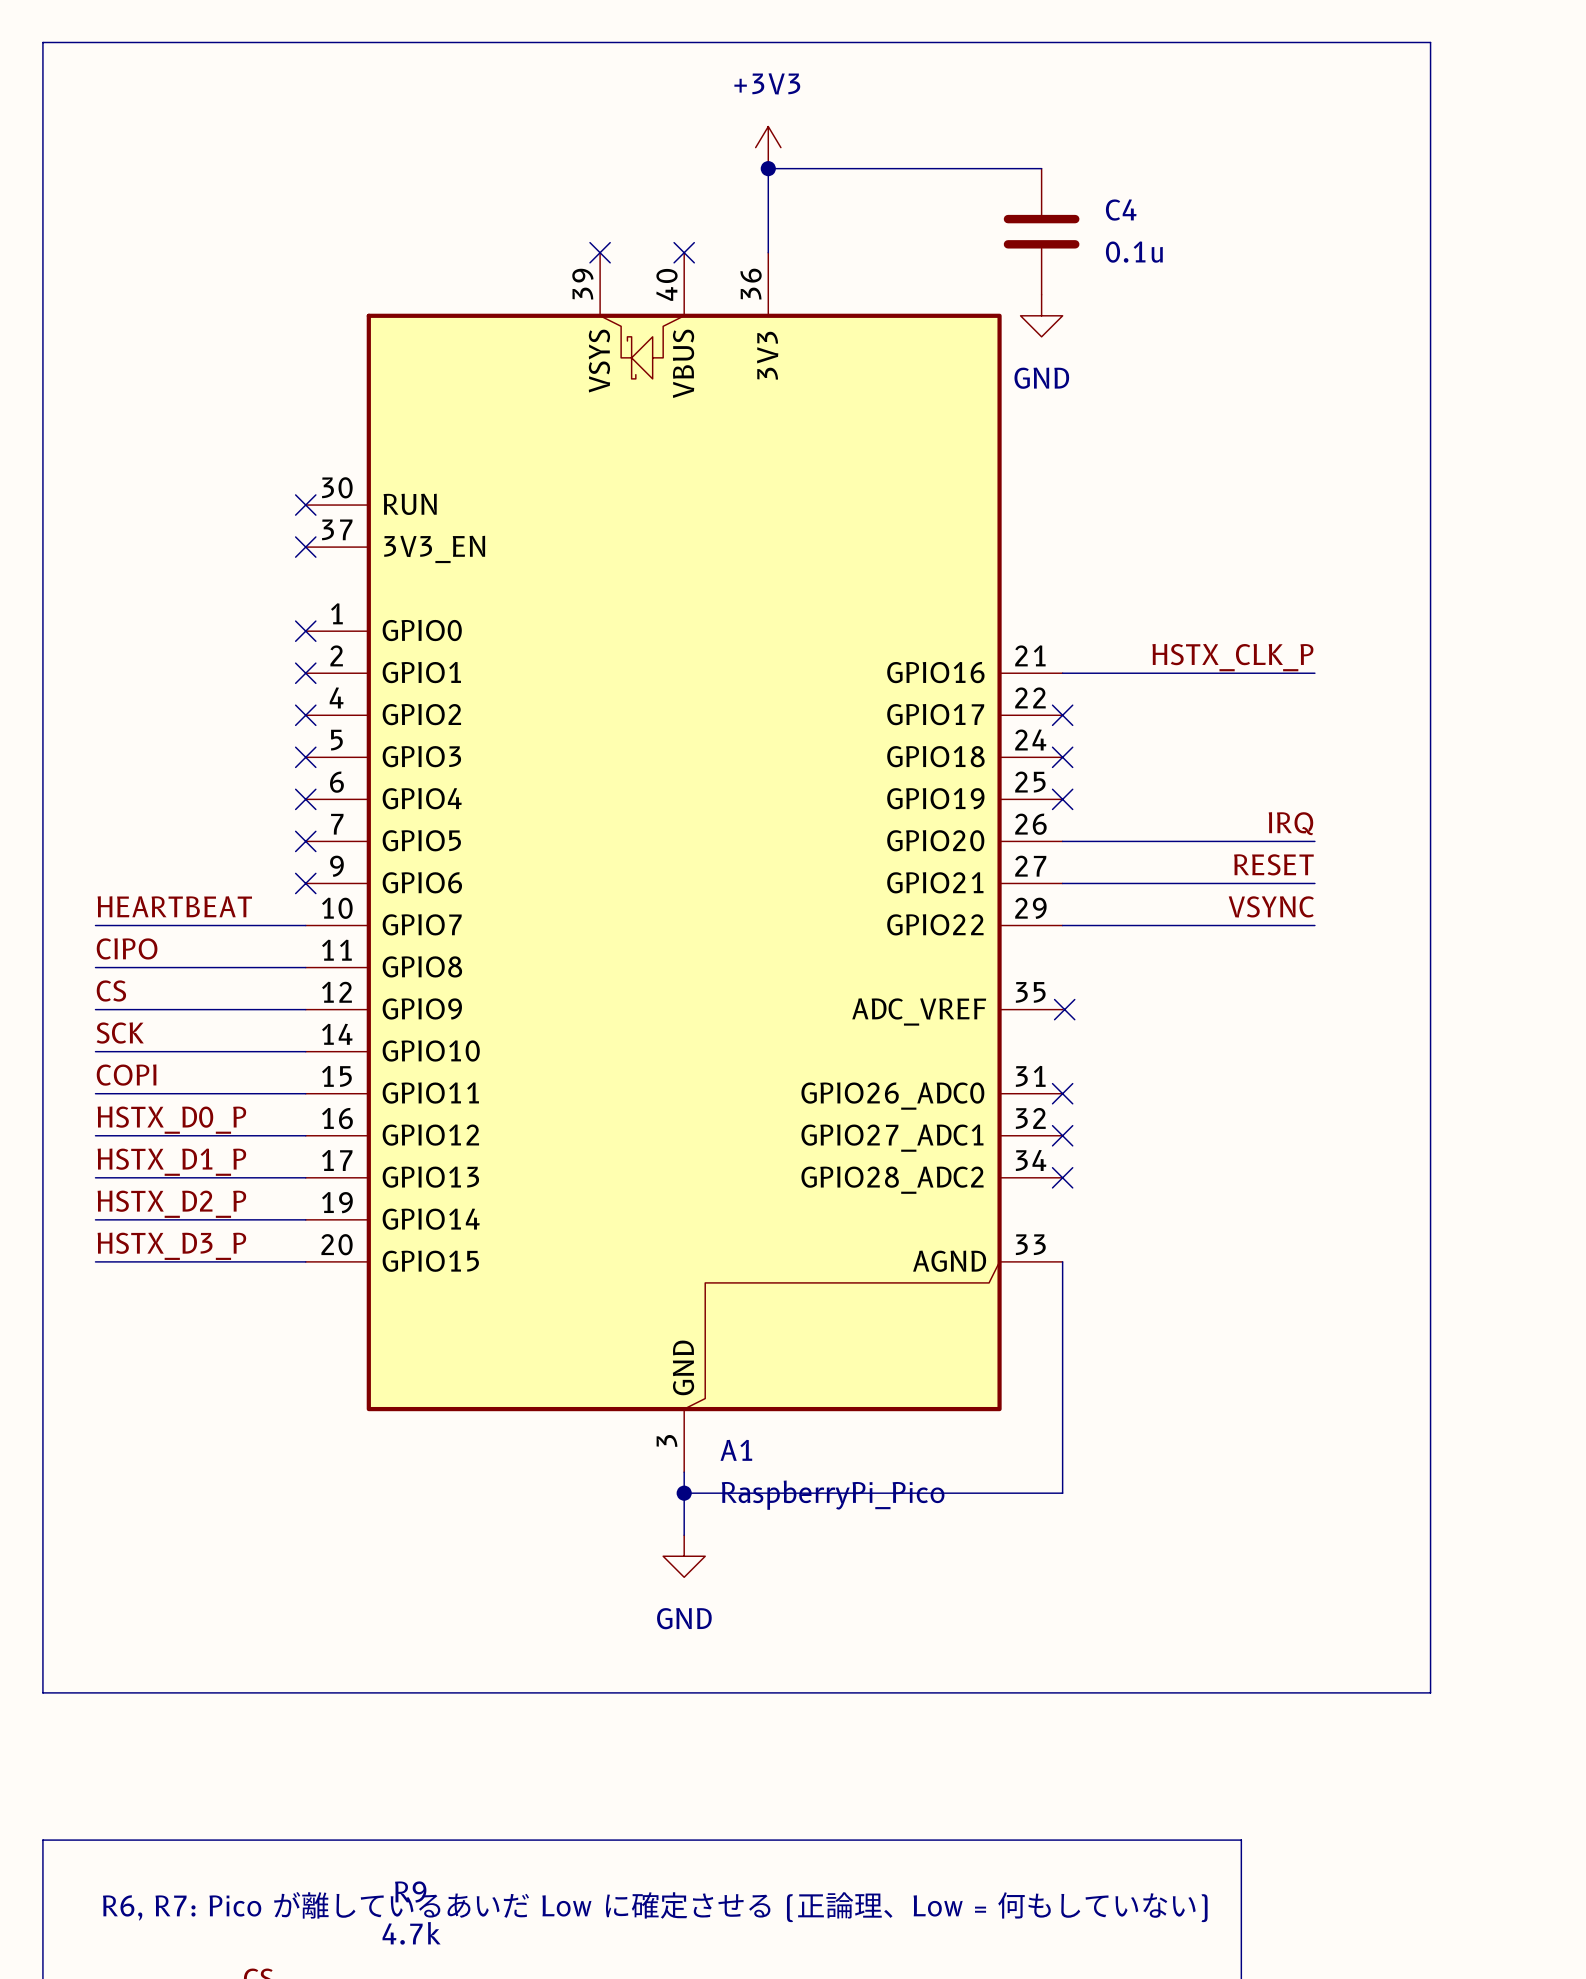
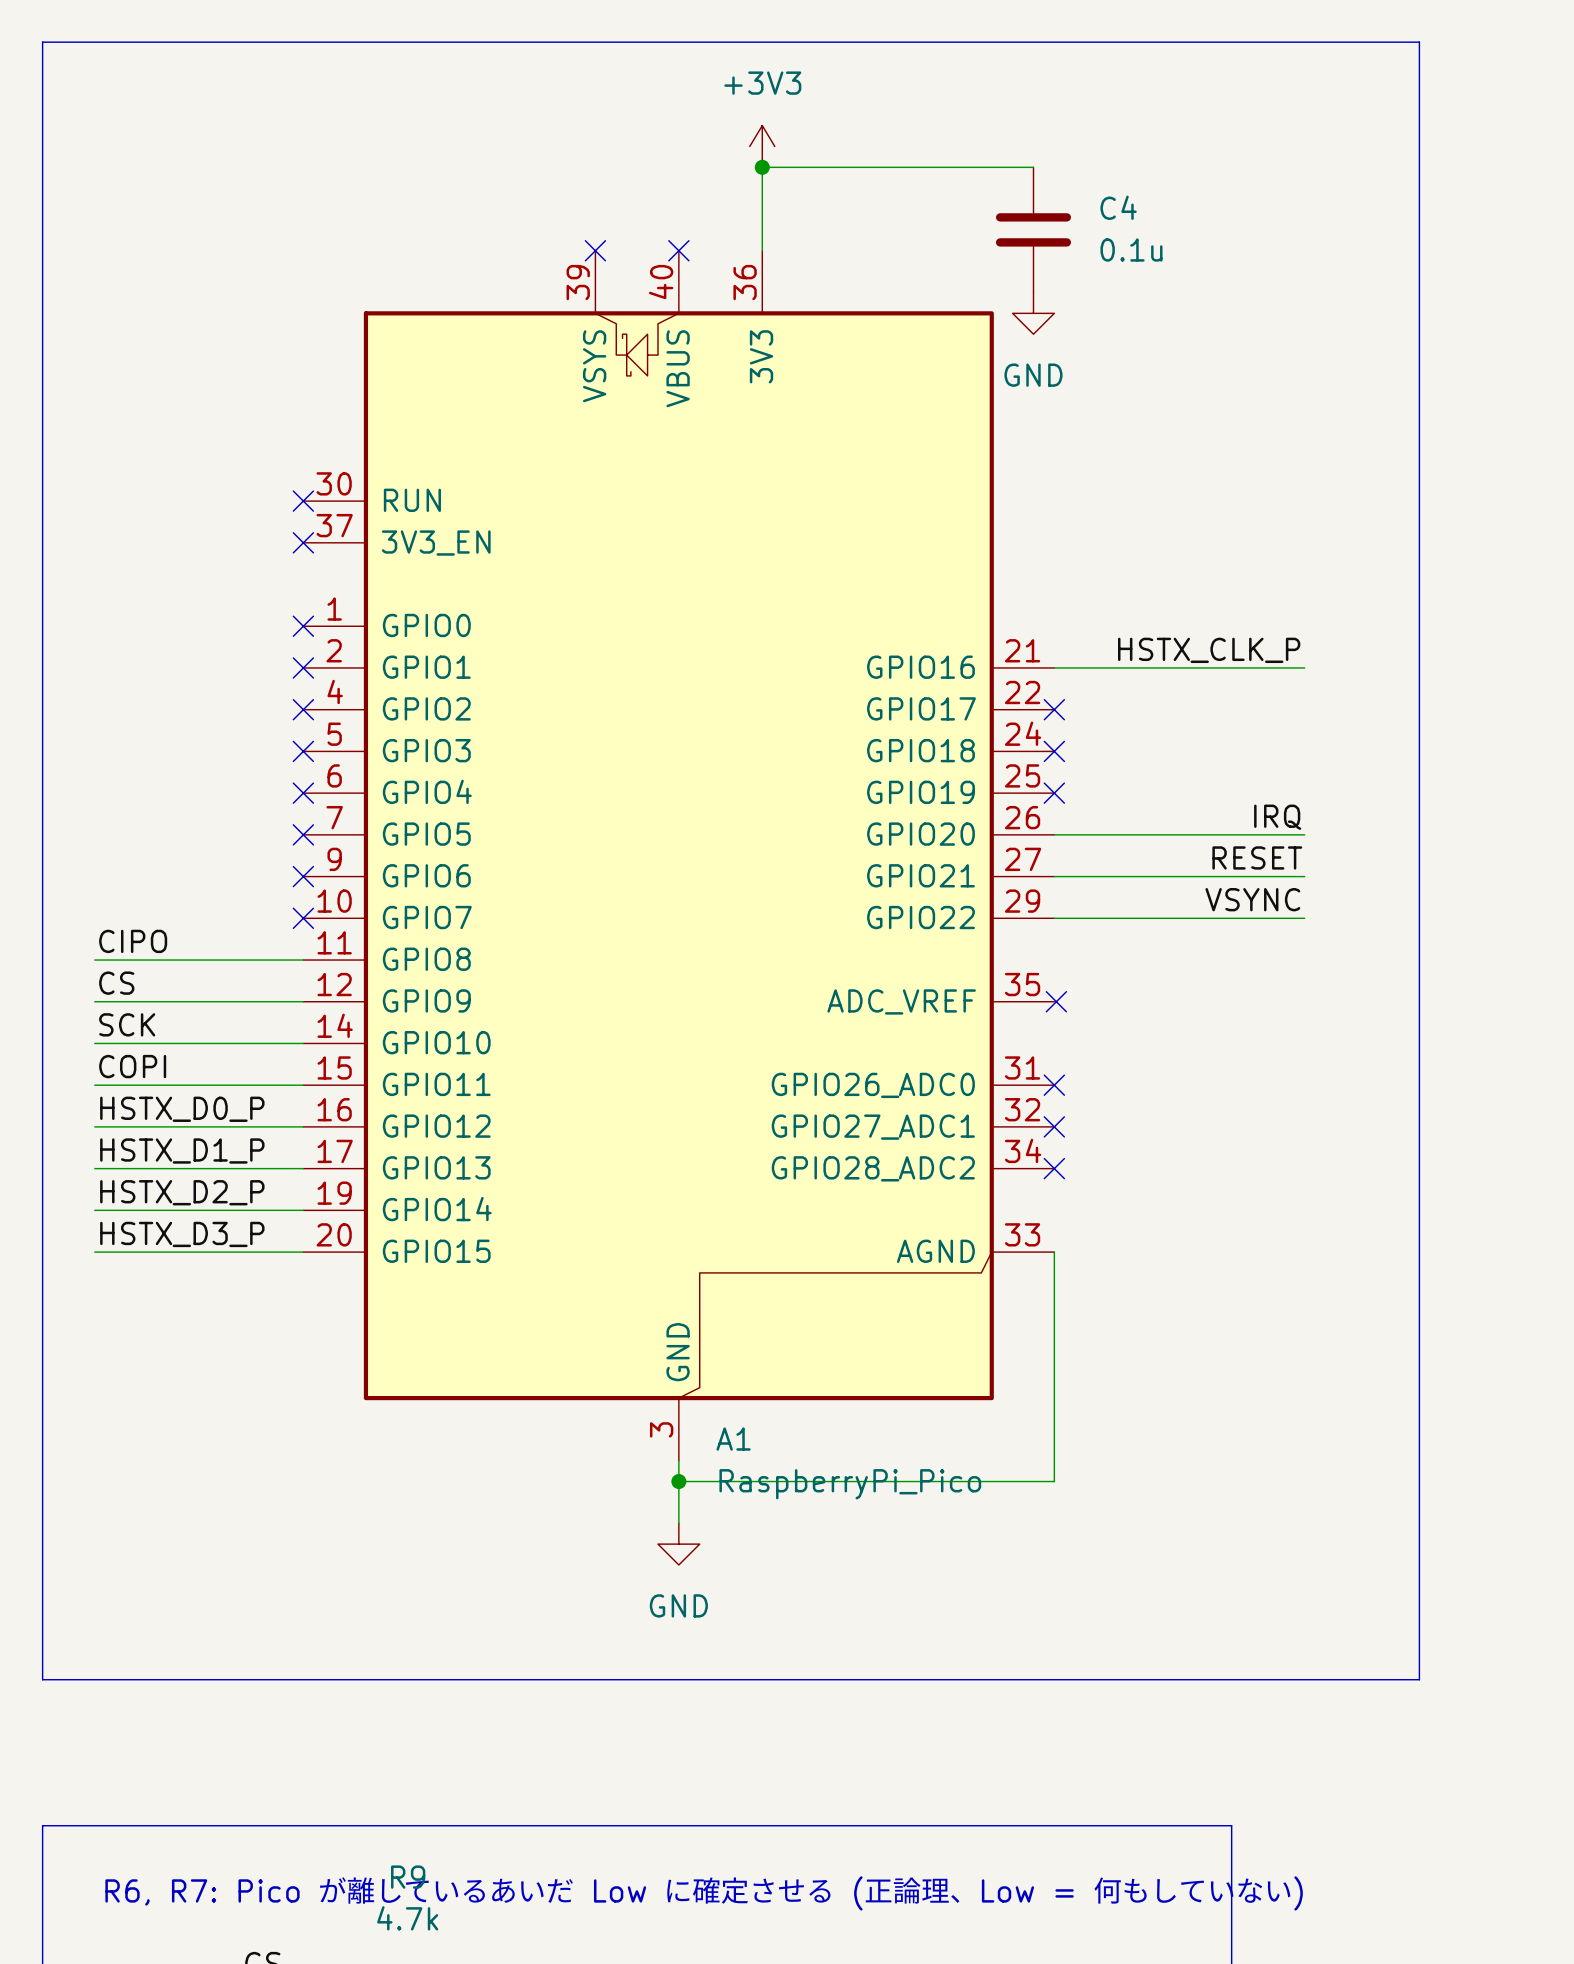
label: HEARTBEAT (174, 906) -> none
wire: (95, 925) (305, 925) -> none
no-connect mark: none -> (303, 918)

